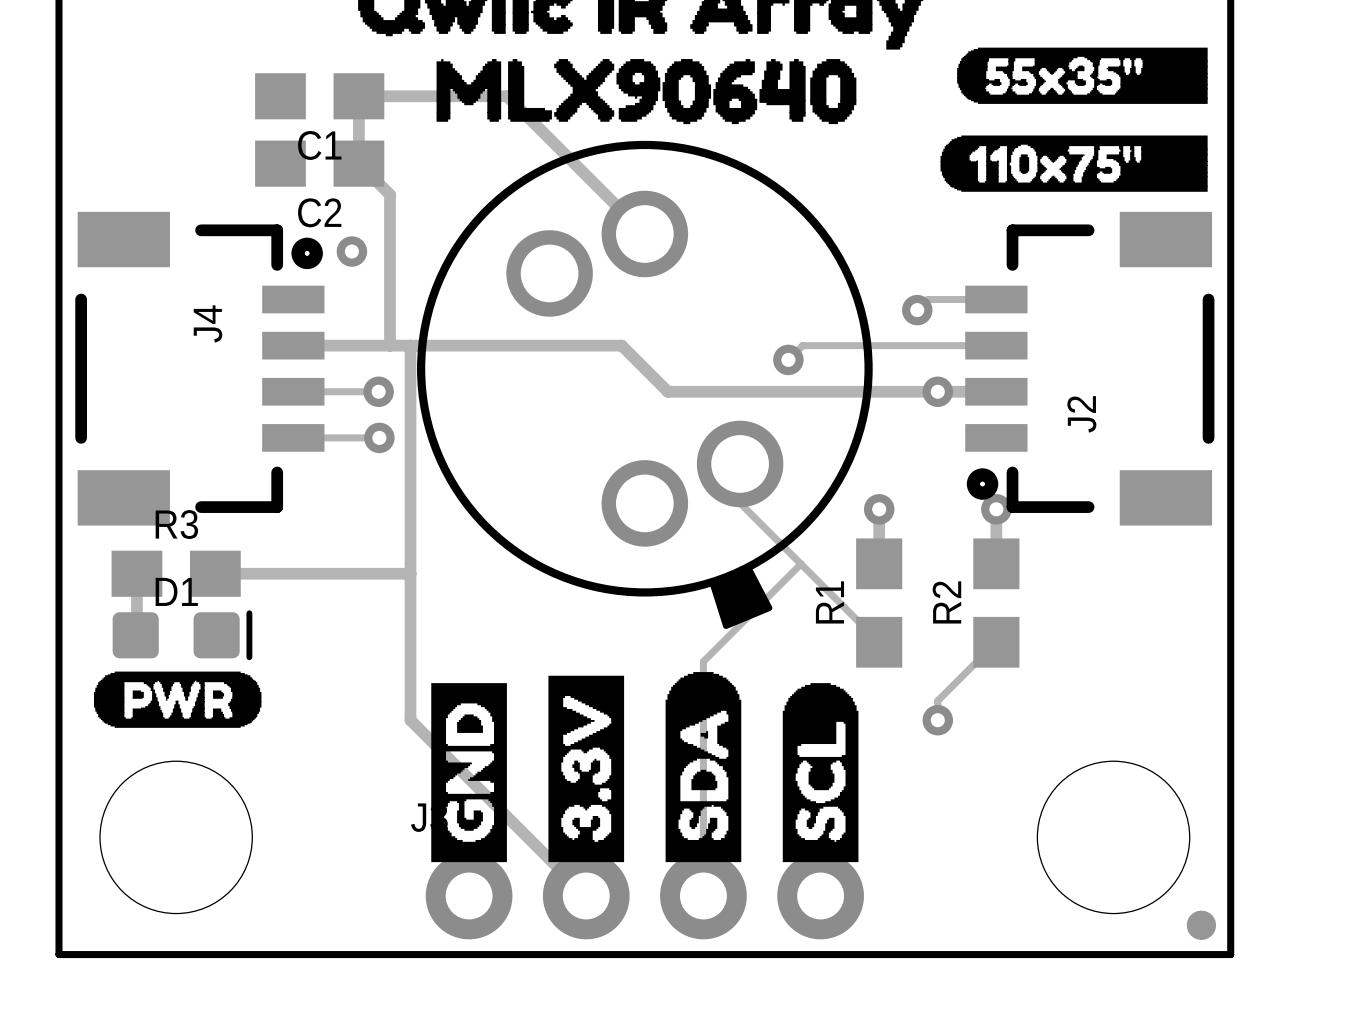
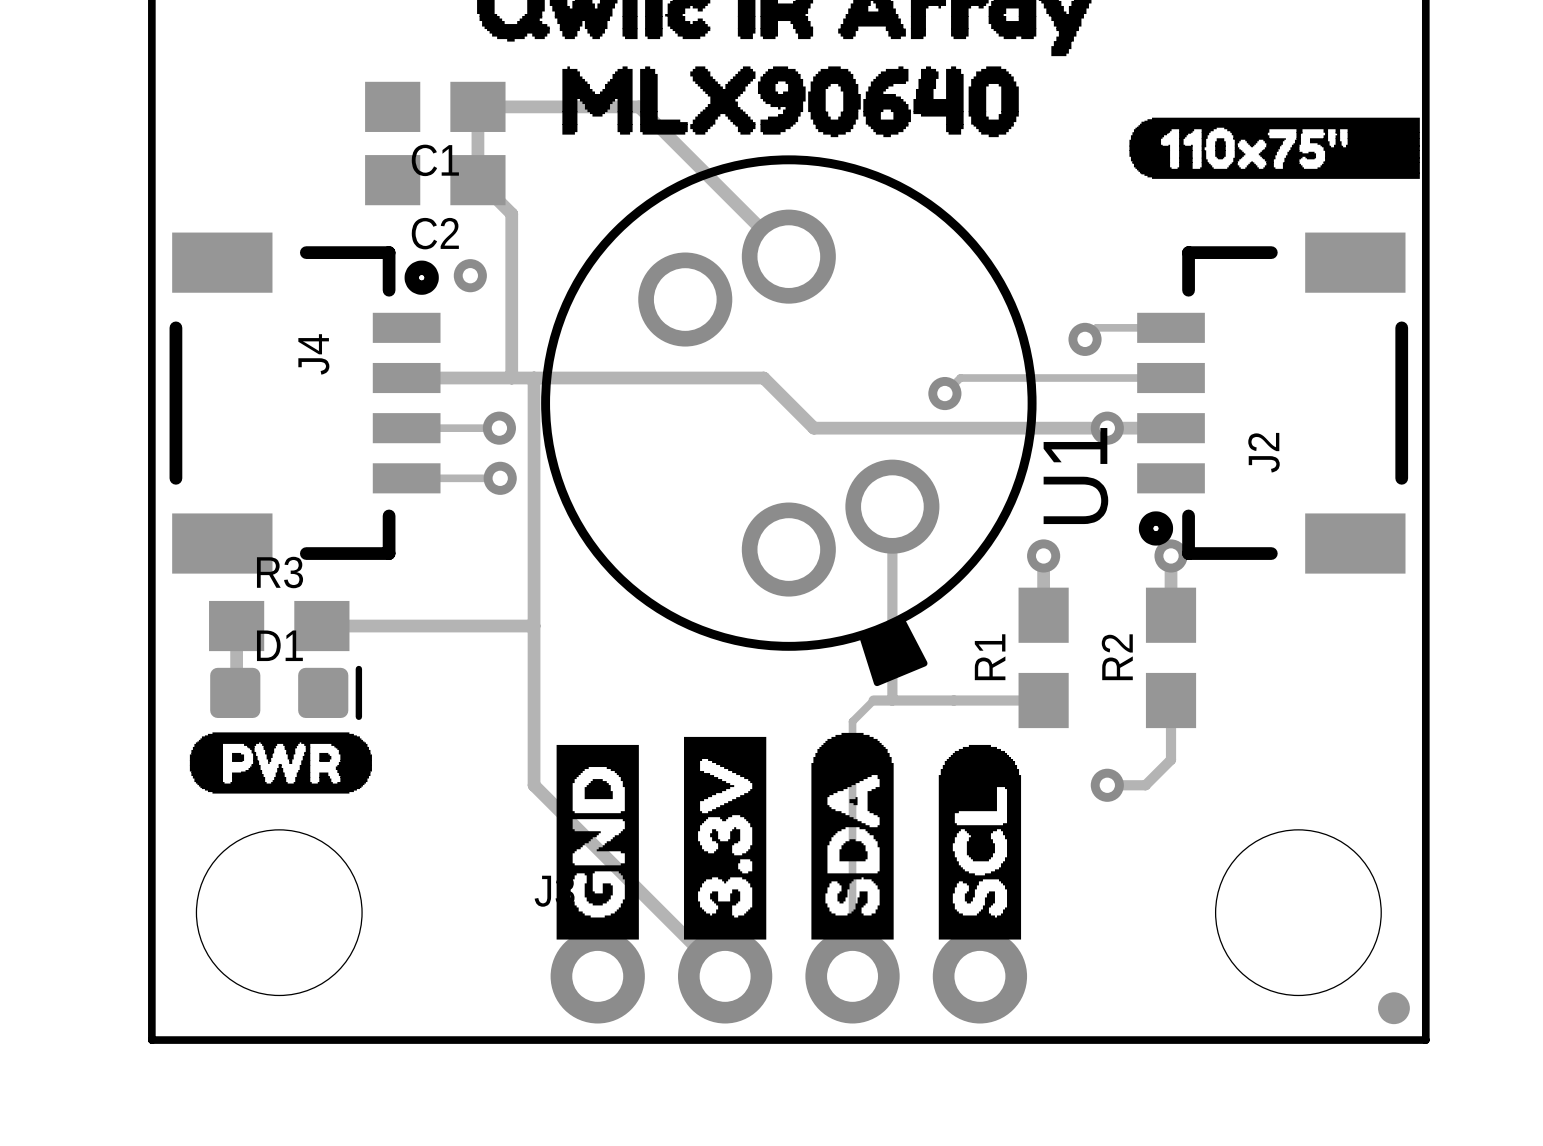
drawing: [957, 47, 1208, 104] -> none
drawing position: (1074, 163) -> (1274, 148)
U1 name: none -> U1 (1075, 476)
track: (740, 503) (879, 642) -> (892, 549) (892, 700)
track: (801, 564) (722, 642) -> (1043, 700) (873, 700)
track: (996, 642) (937, 700) (937, 720) -> (1171, 700) (1171, 759) (1145, 785) (1107, 785)

